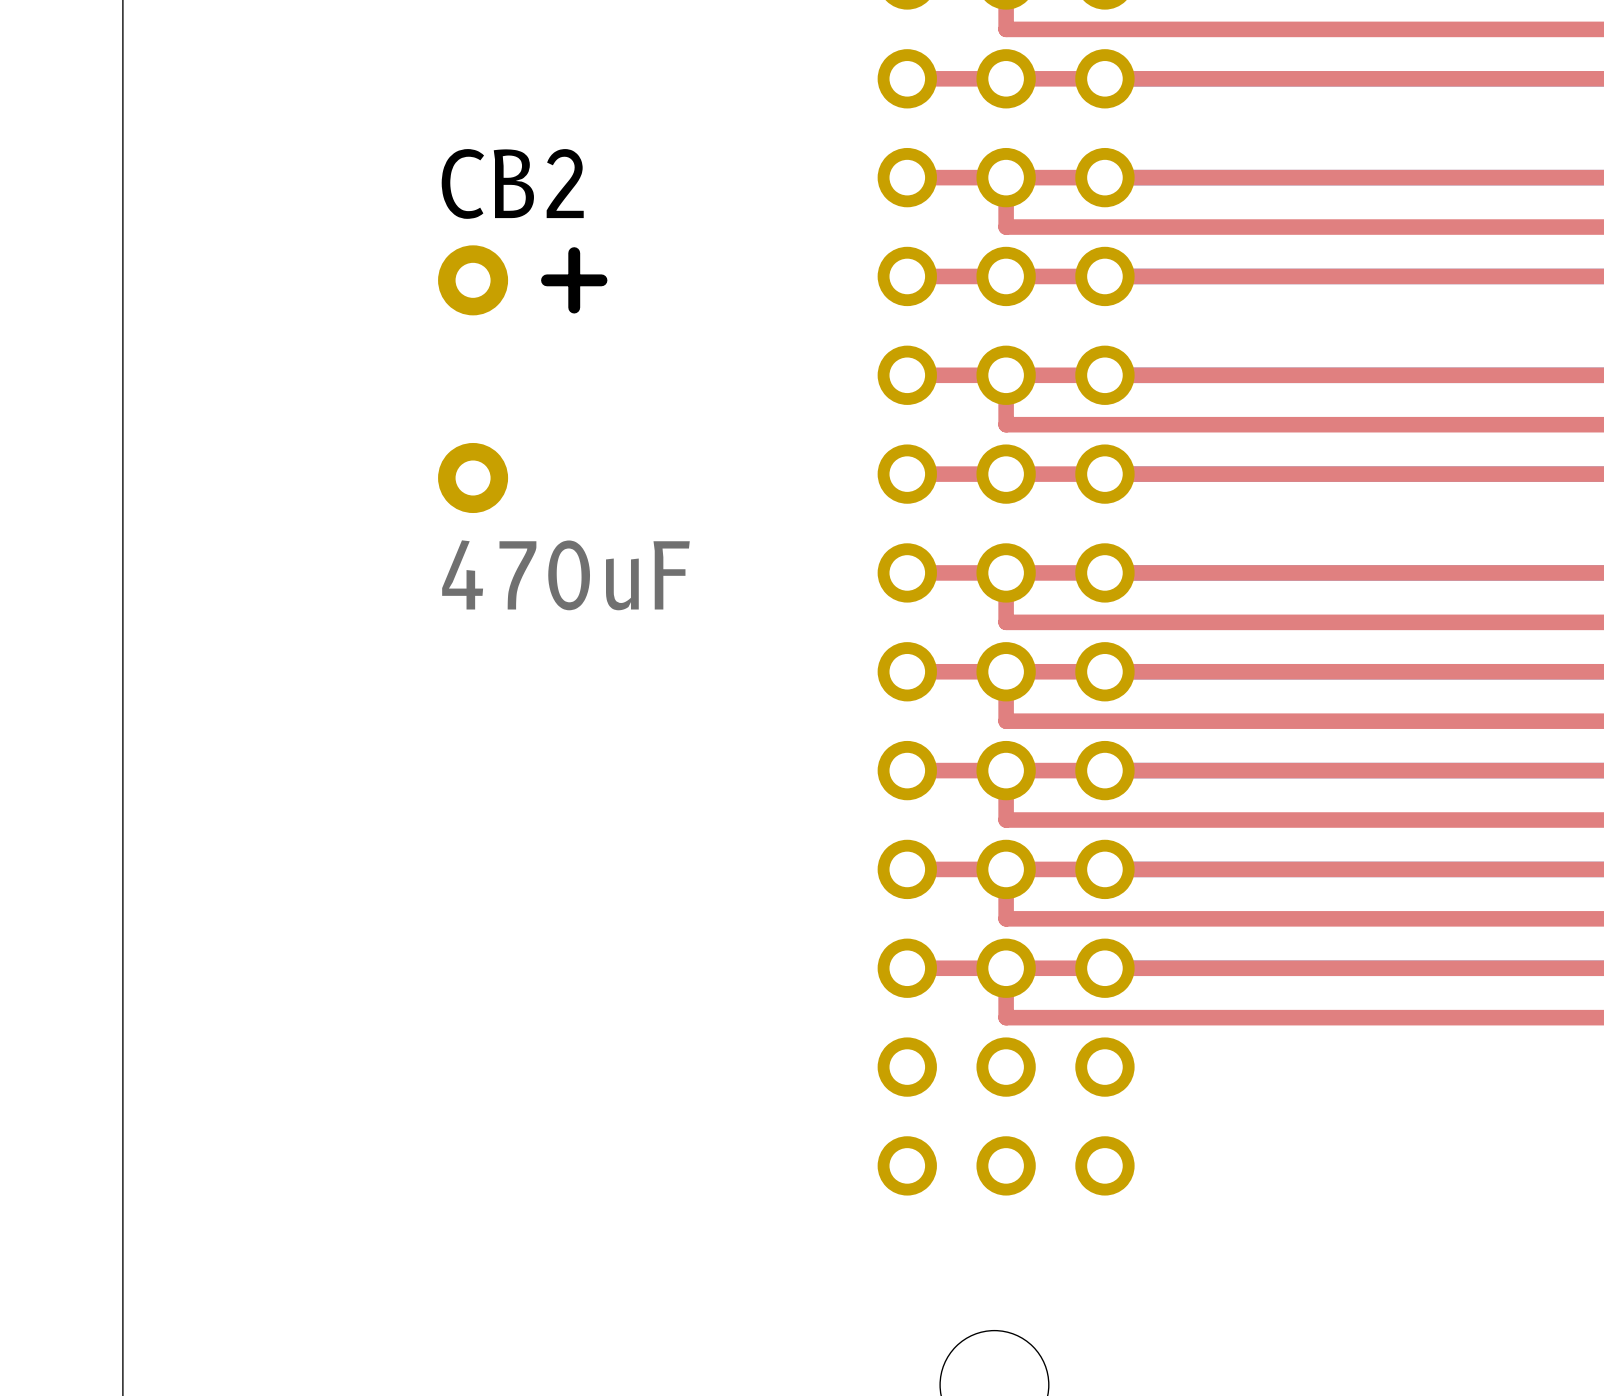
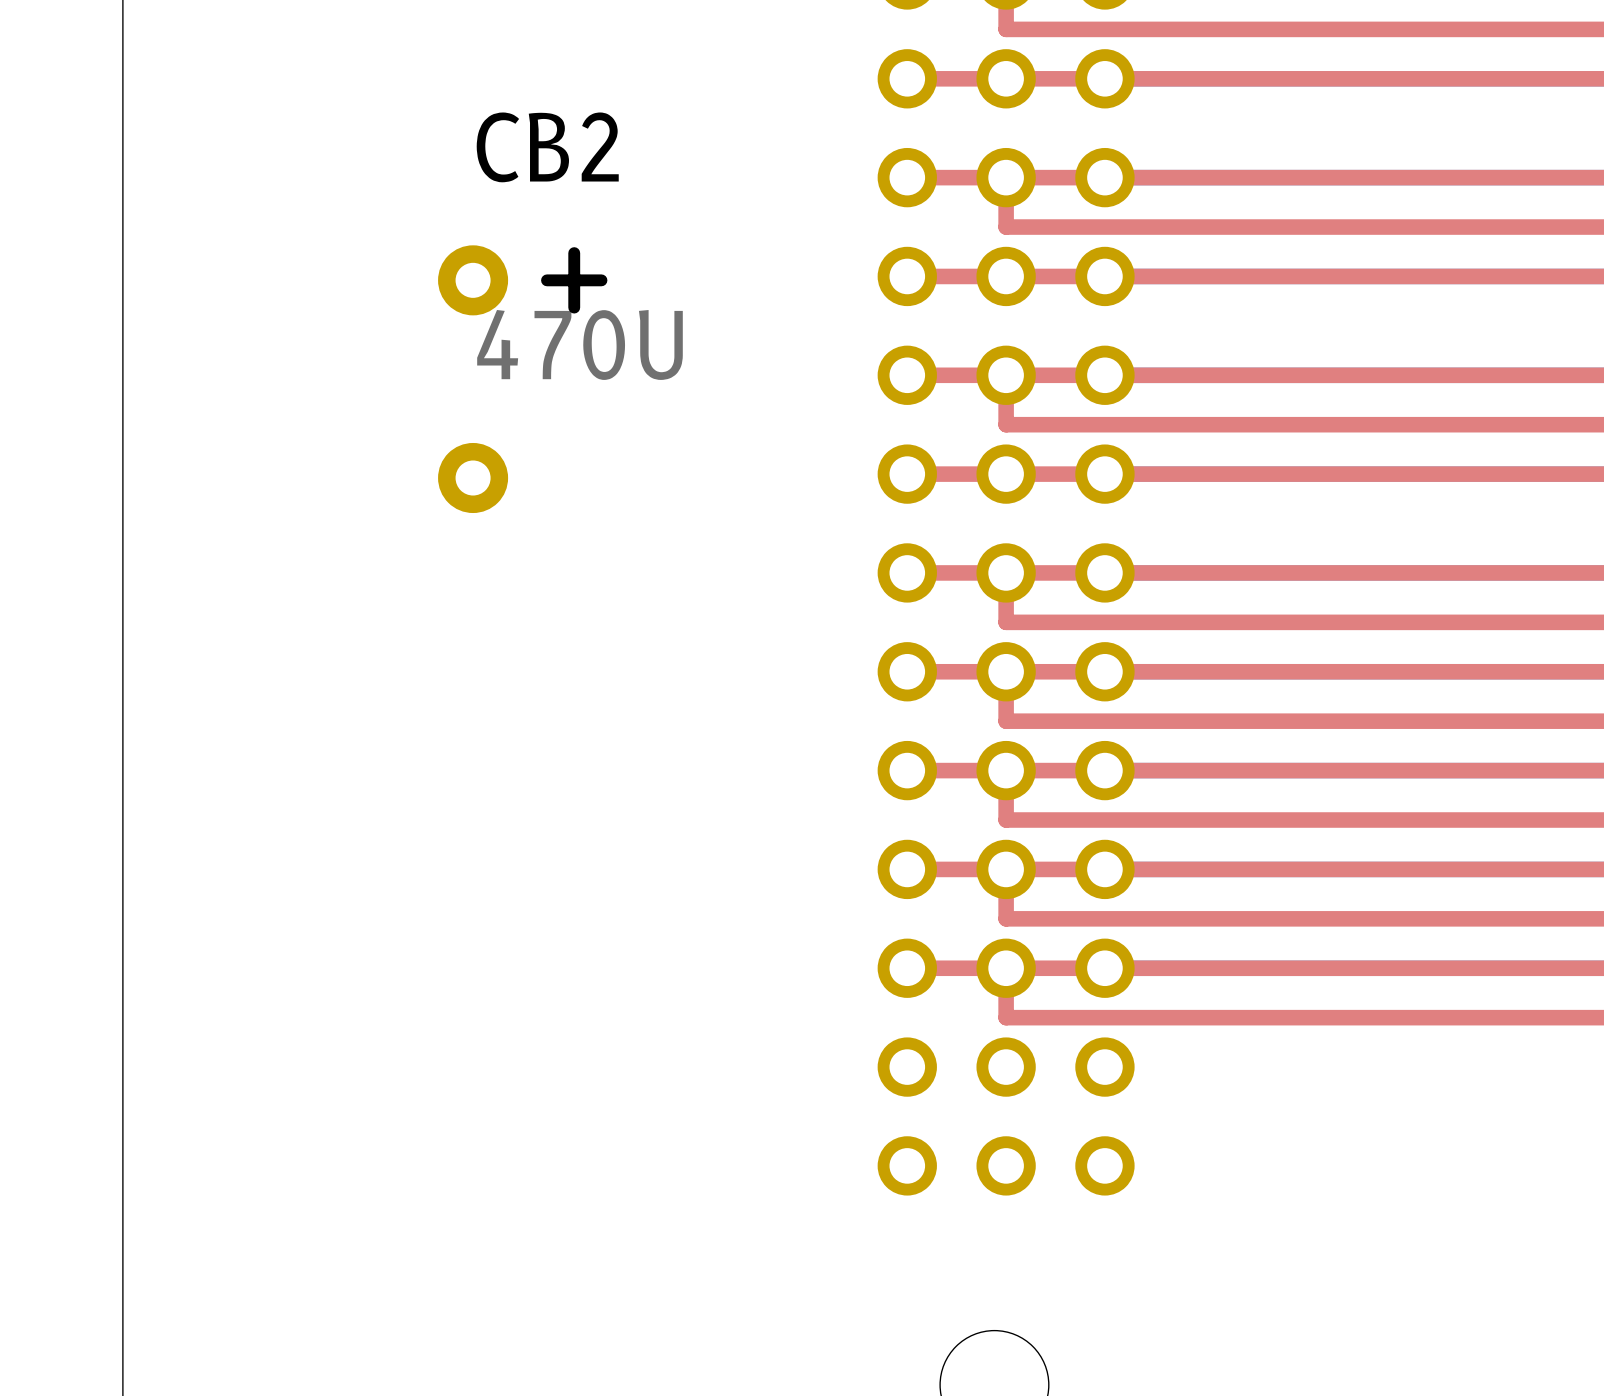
CB2 name position: CB2 (512, 183) -> CB2 (547, 147)
CB2 value: 470uF (565, 575) -> 470U (579, 344)

